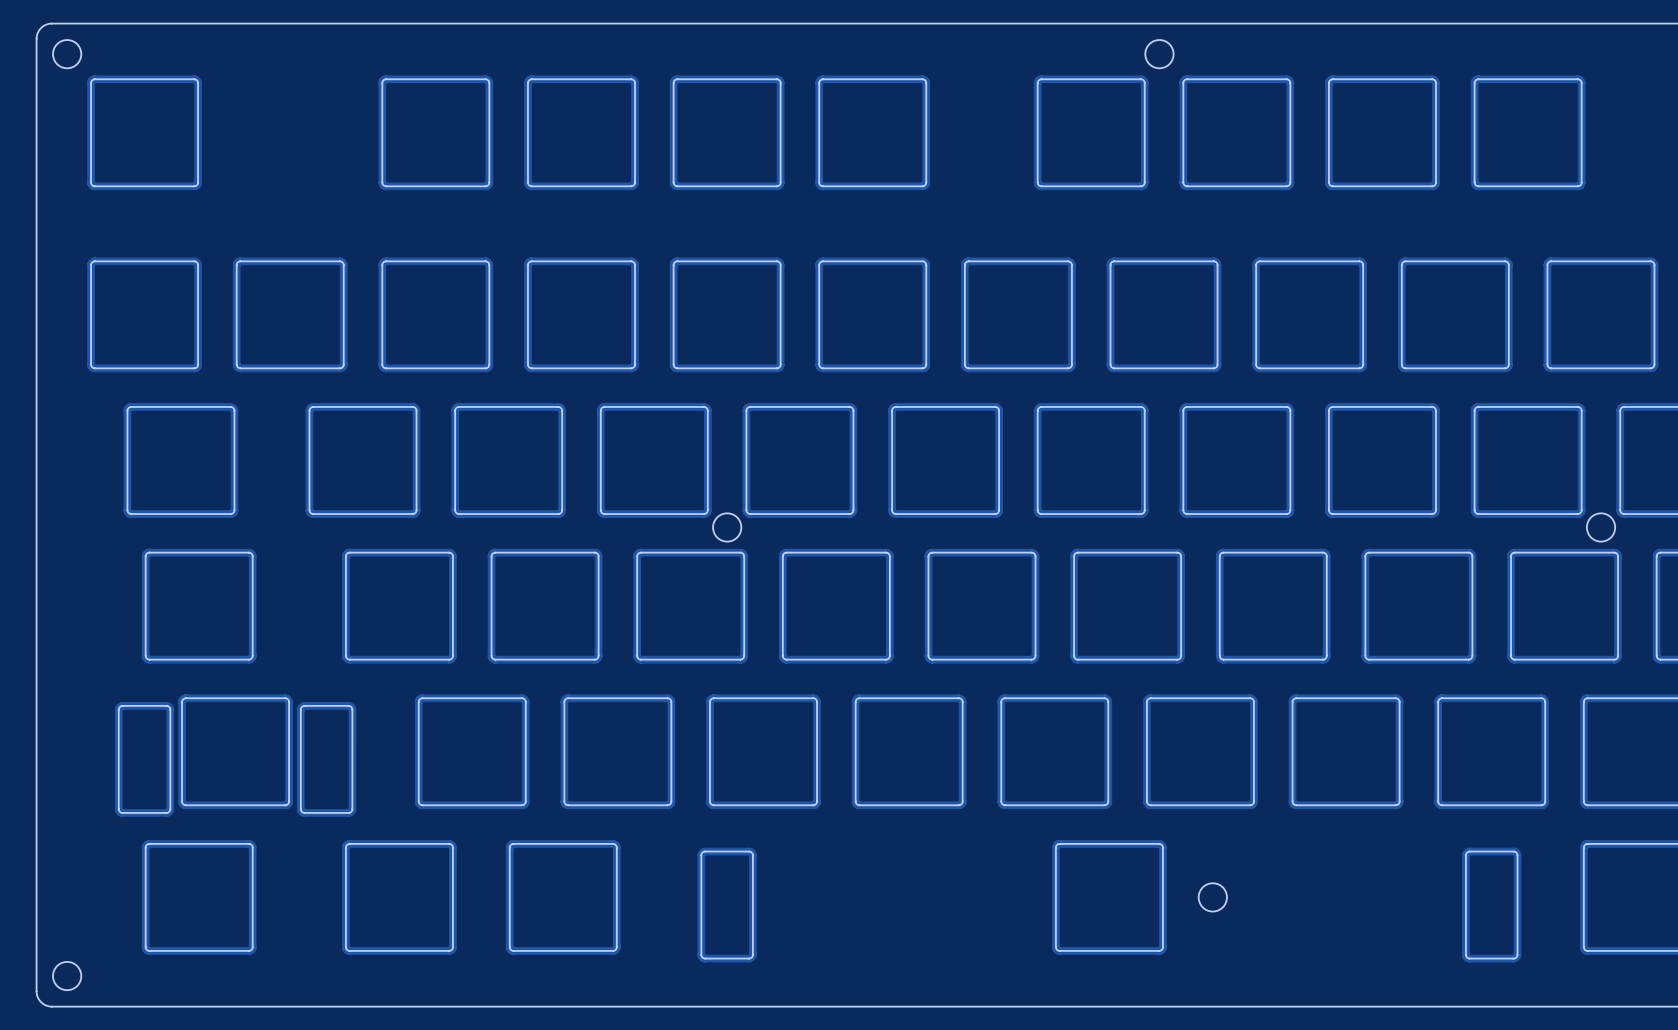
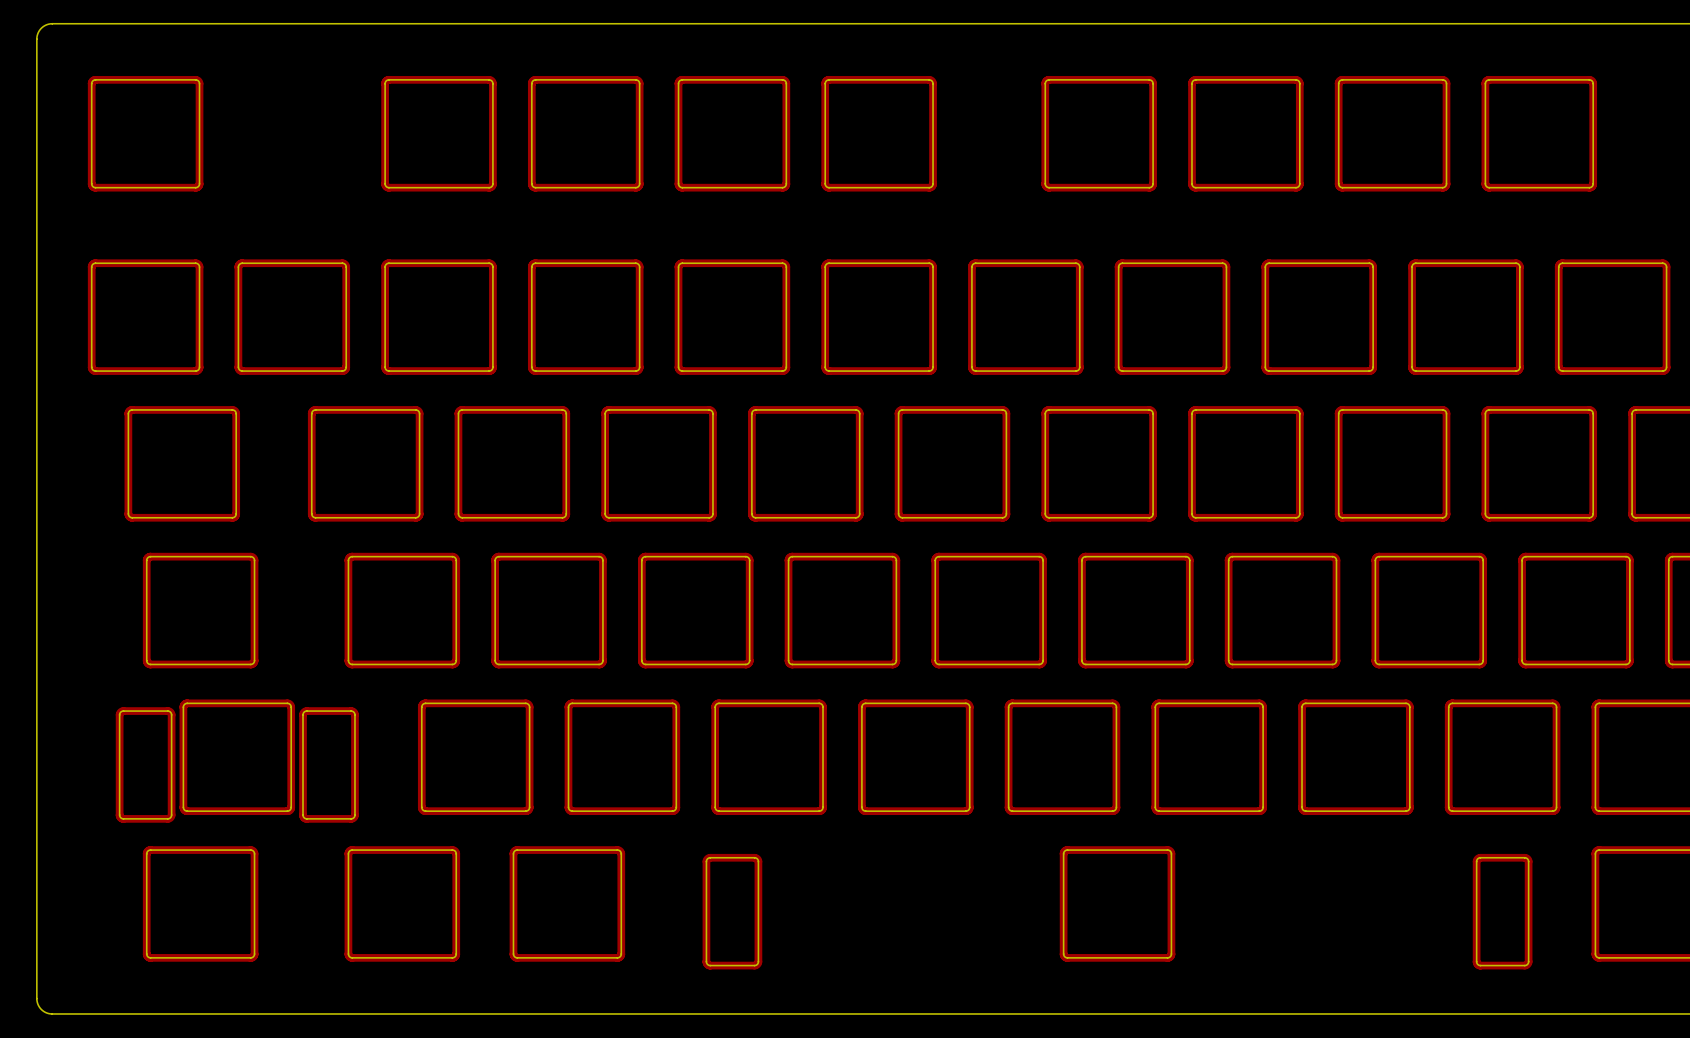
round board edge: [52, 39, 82, 69] -> none
round board edge: [1144, 39, 1175, 69] -> none
round board edge: [712, 512, 742, 543] -> none
round board edge: [1586, 512, 1616, 543] -> none
round board edge: [1198, 882, 1228, 913] -> none
round board edge: [52, 961, 82, 991] -> none

